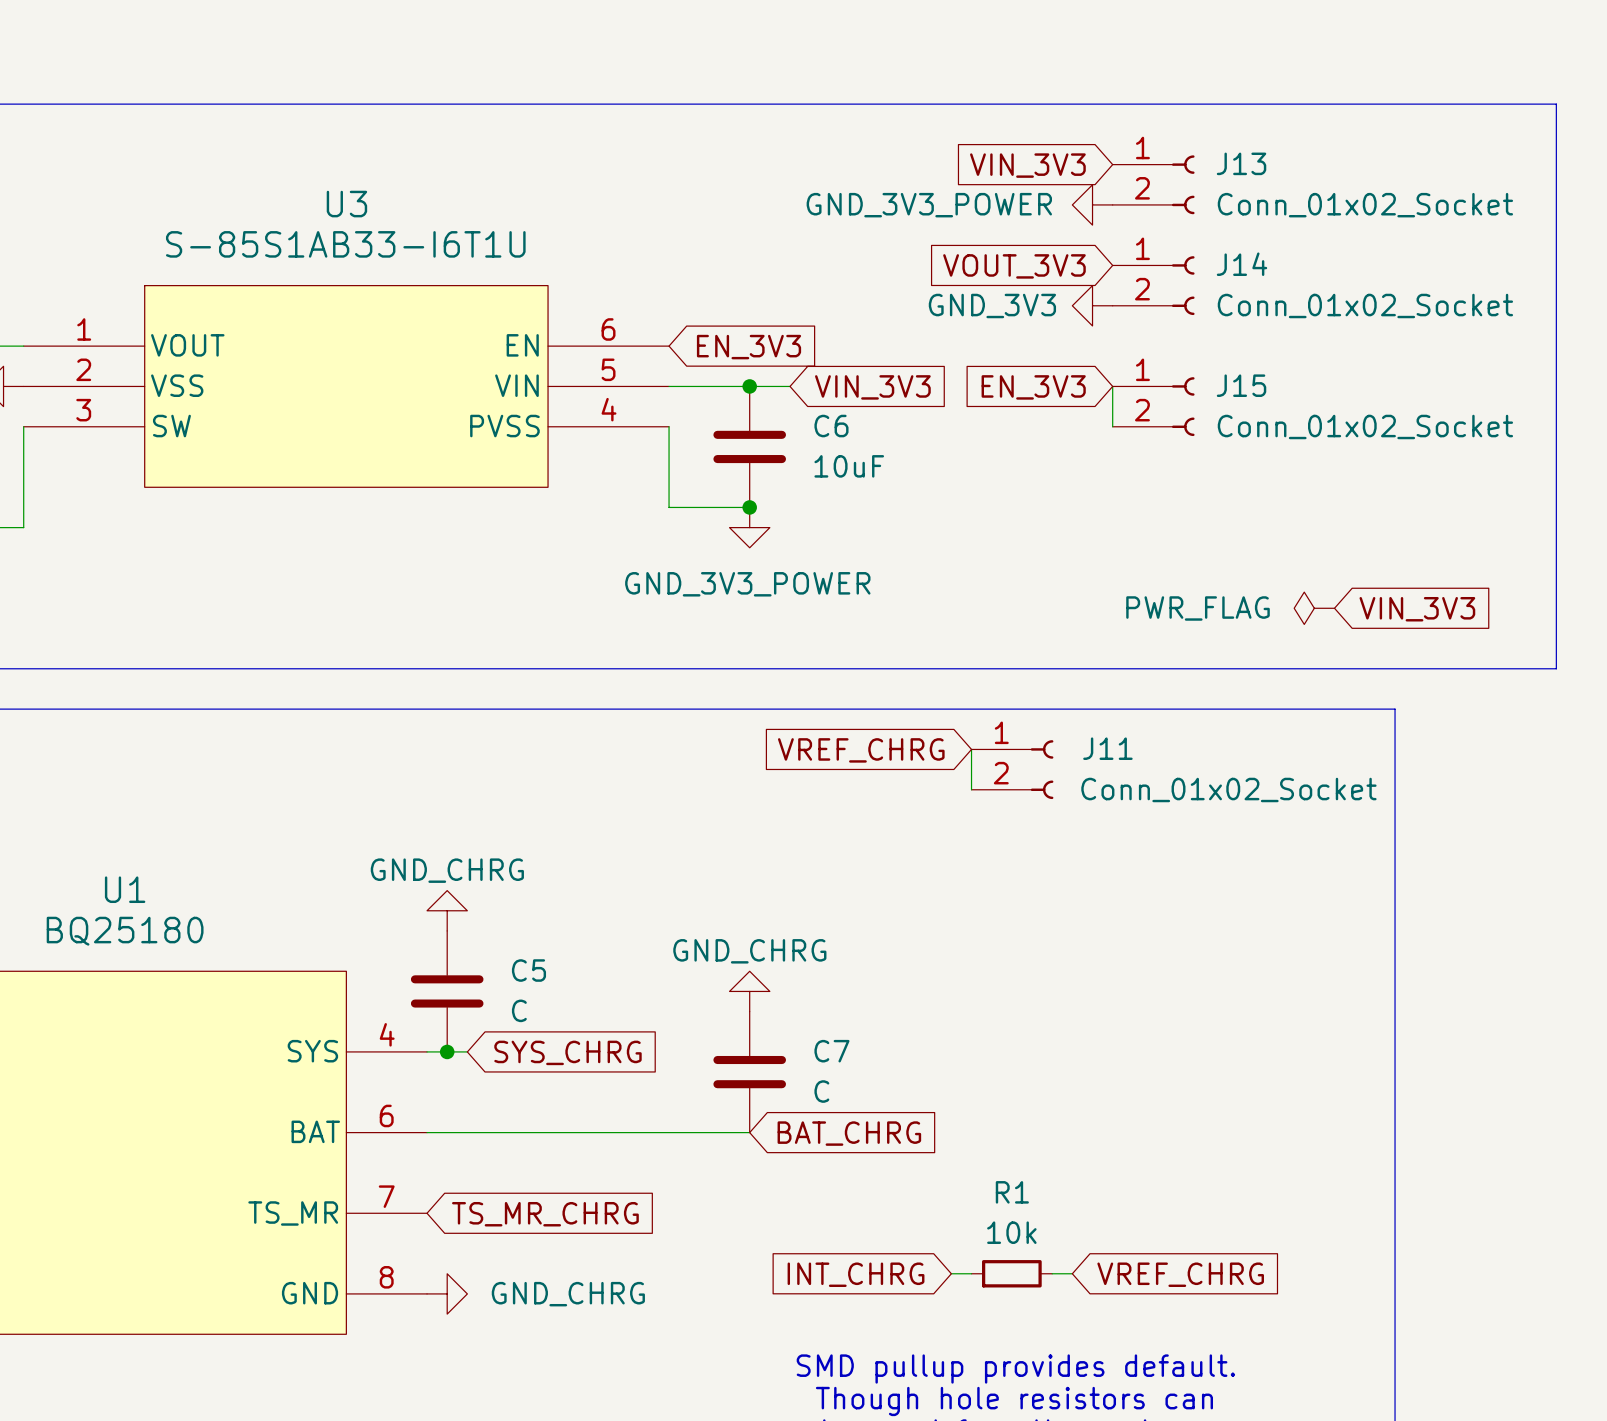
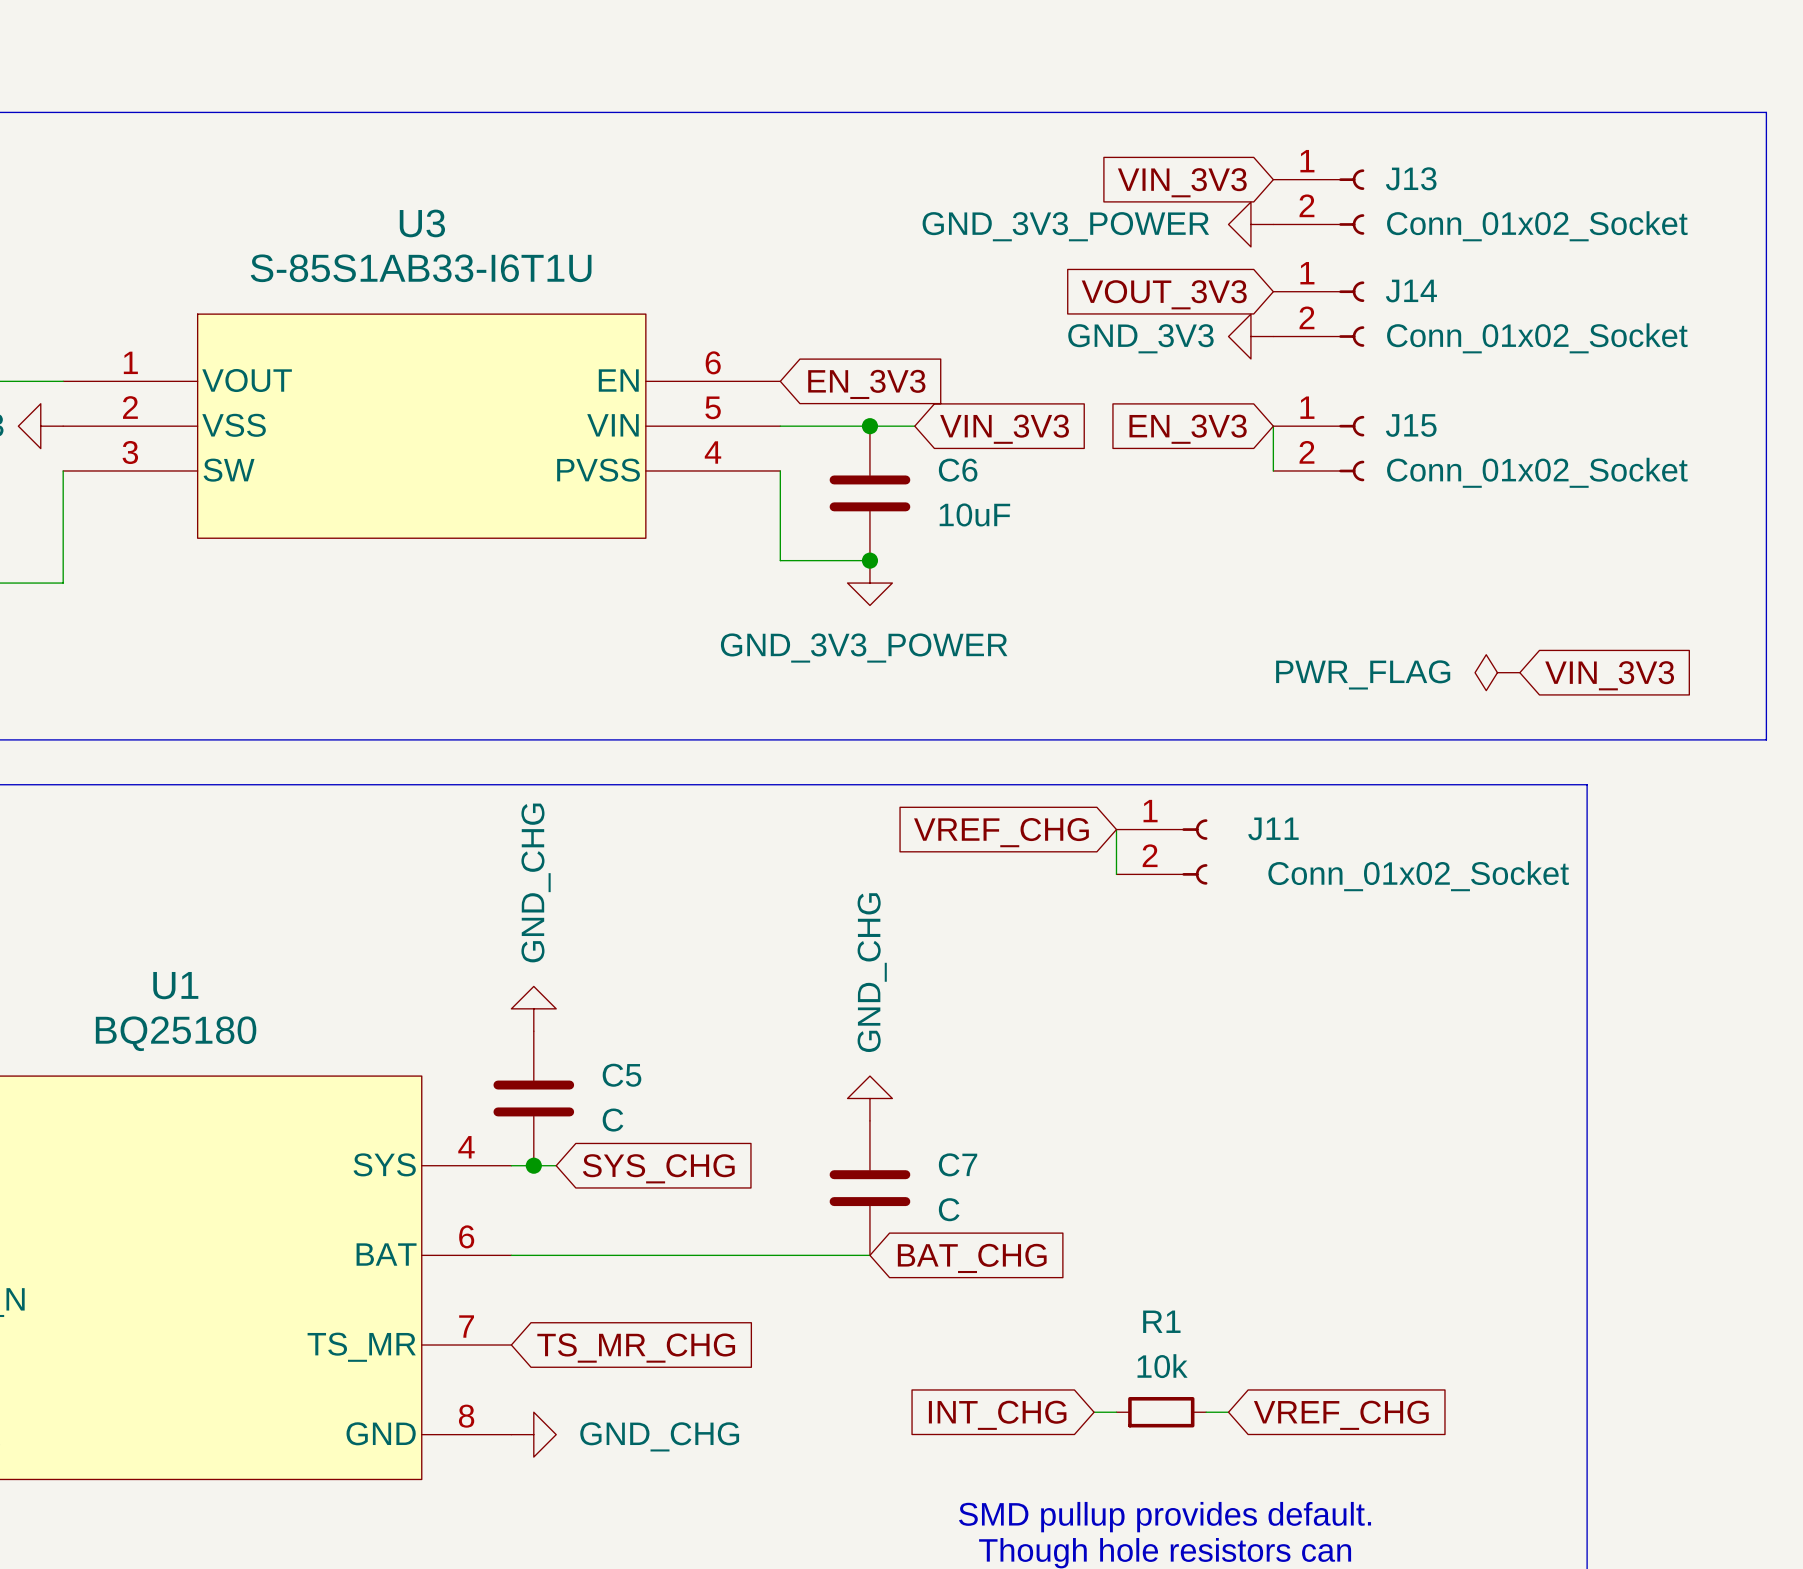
global label: VREF_CHRG (861, 750) -> VREF_CHG (1001, 832)
power symbol: GND_CHRG (447, 910) -> GND_CHG (533, 1008)
power symbol: GND_CHRG (749, 991) -> GND_CHG (869, 1098)
global label: SYS_CHRG (567, 1052) -> SYS_CHG (658, 1168)
global label: BAT_CHRG (849, 1133) -> BAT_CHG (972, 1258)
global label: TS_MR_CHRG (545, 1214) -> TS_MR_CHG (636, 1348)
global label: INT_CHRG (856, 1274) -> INT_CHG (997, 1415)
global label: VREF_CHRG (1180, 1274) -> VREF_CHG (1341, 1415)
power symbol: GND_CHRG (447, 1293) -> GND_CHG (533, 1434)

